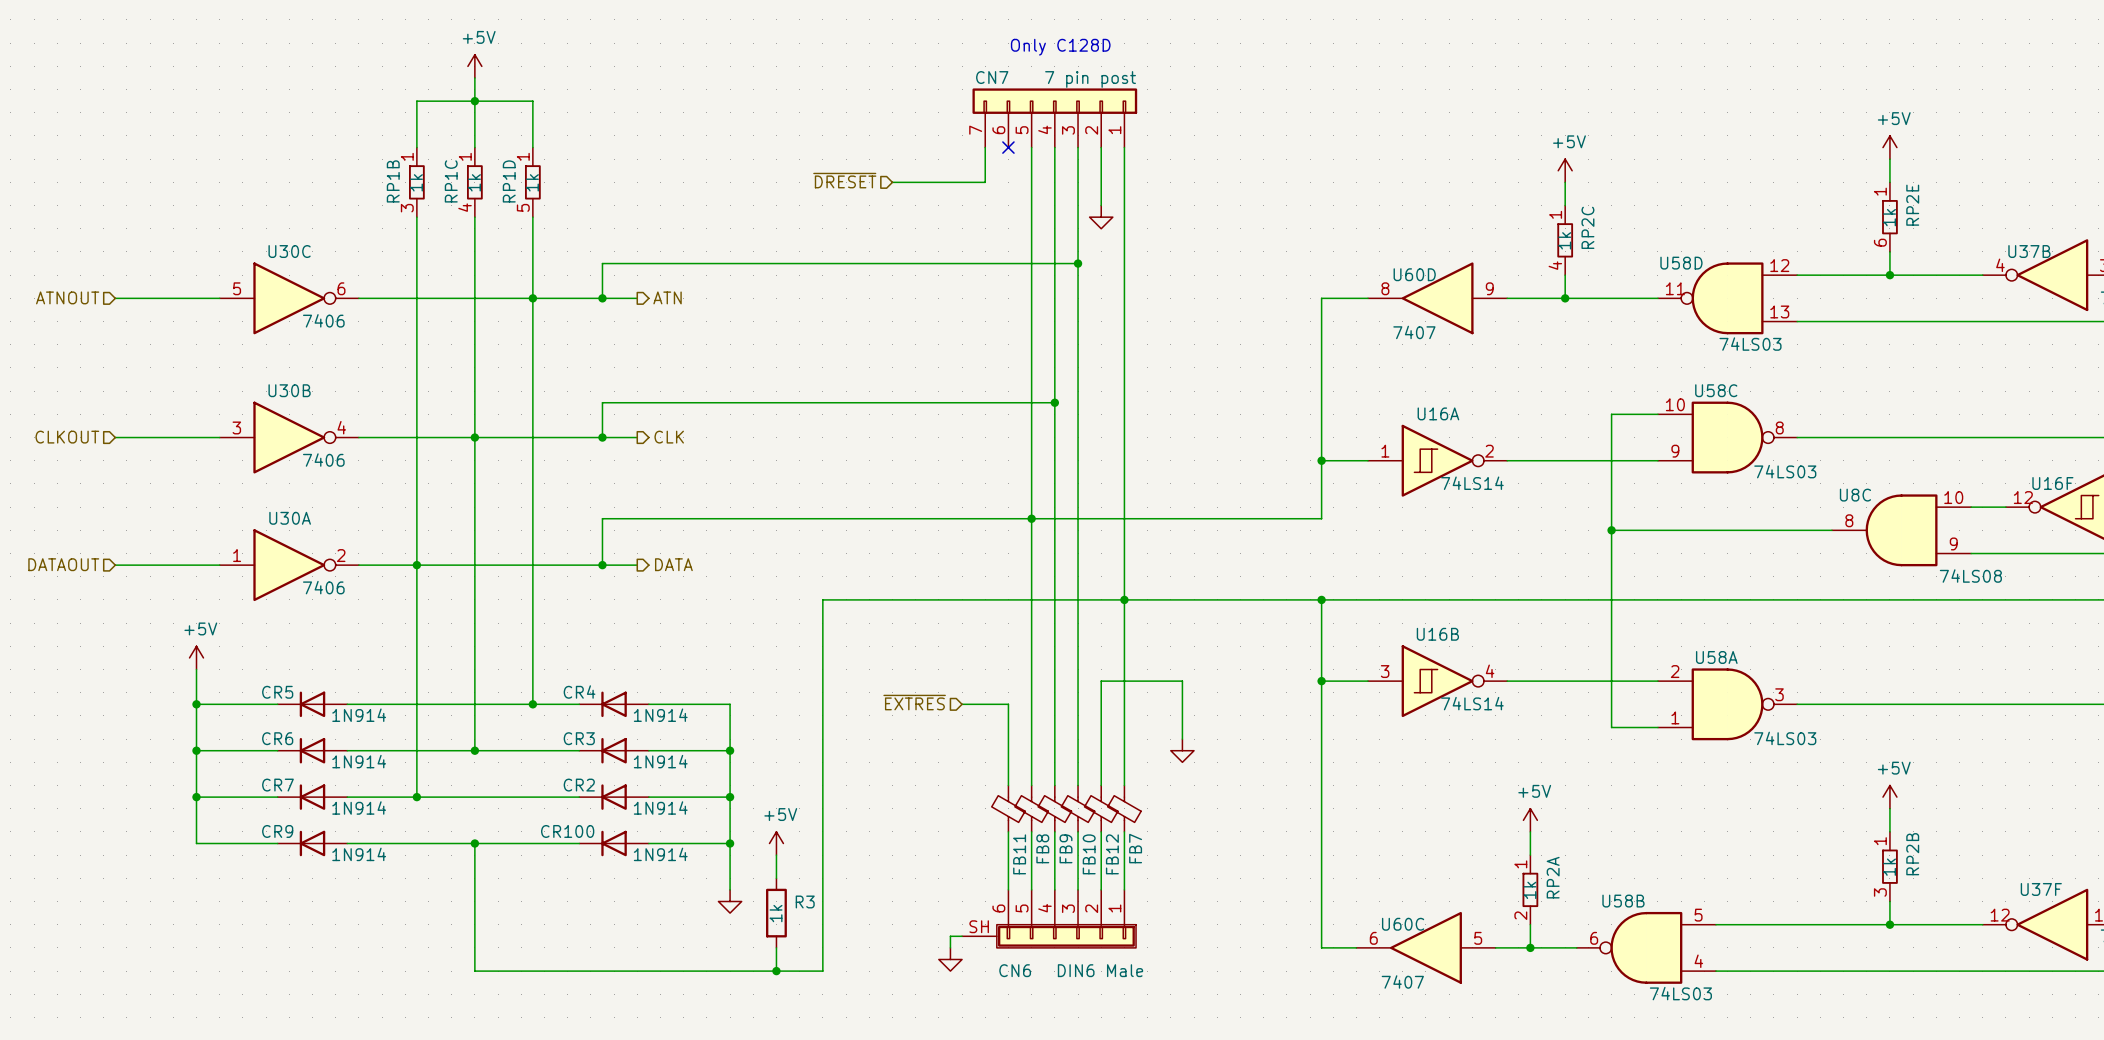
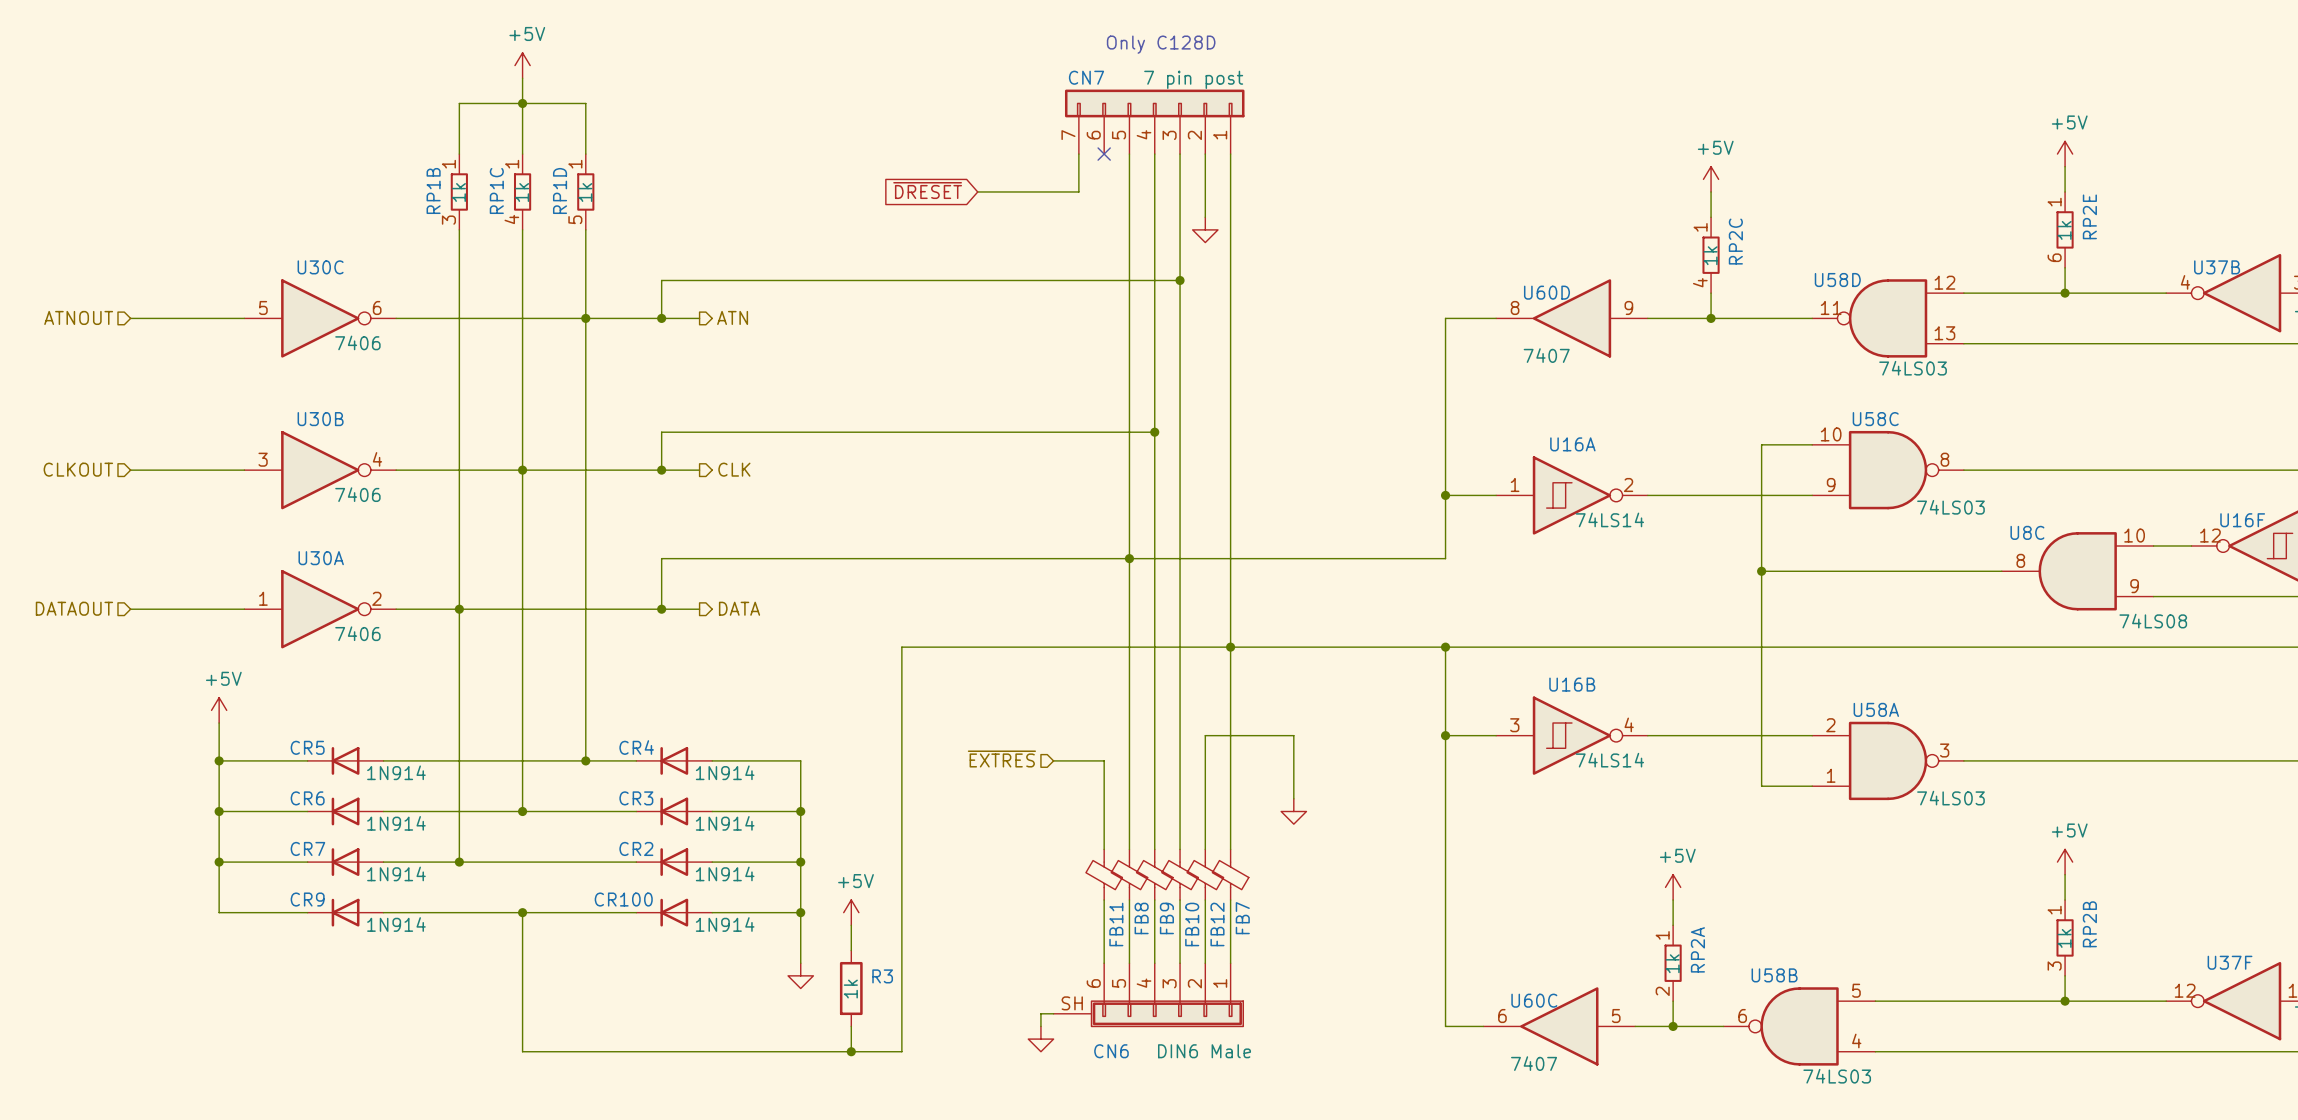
hierarchical label: ~{DRESET} (844, 180) -> none
global label: none -> ~{DRESET} (927, 190)

